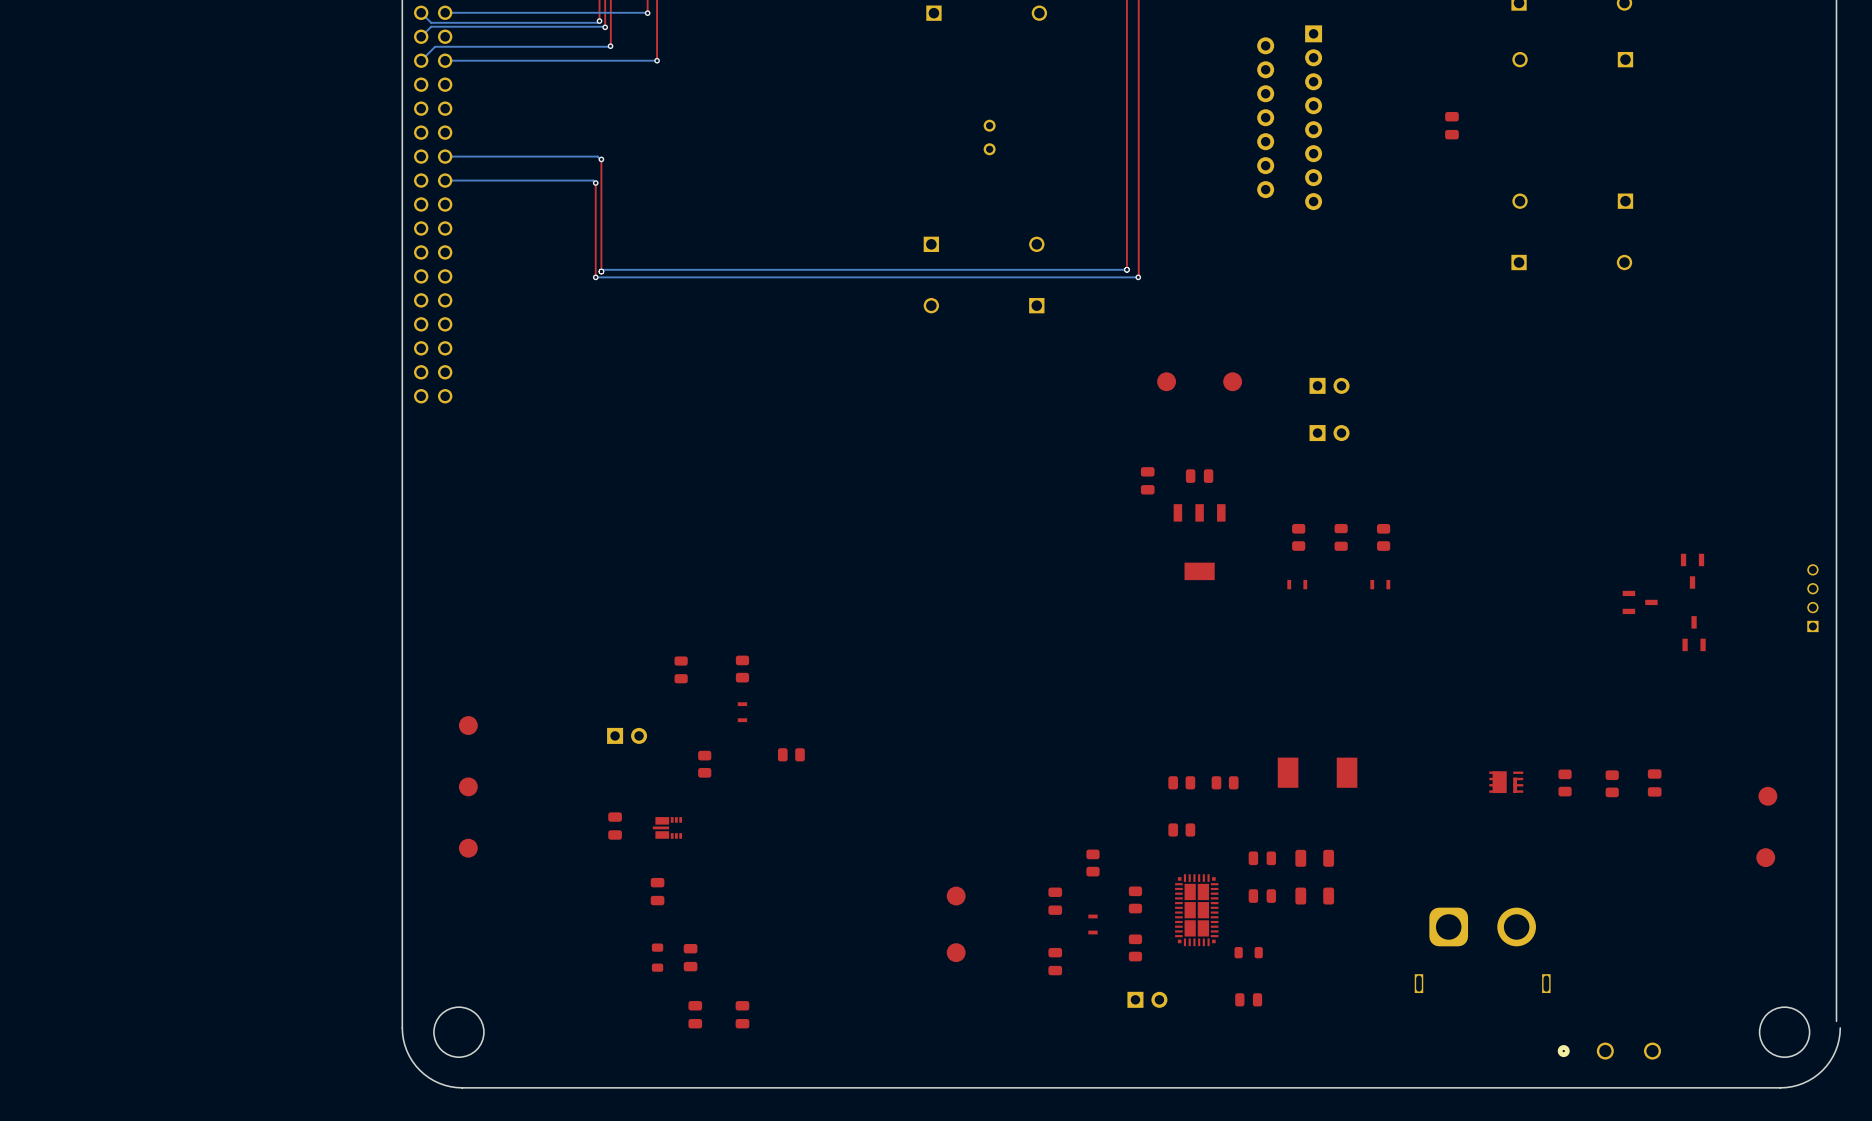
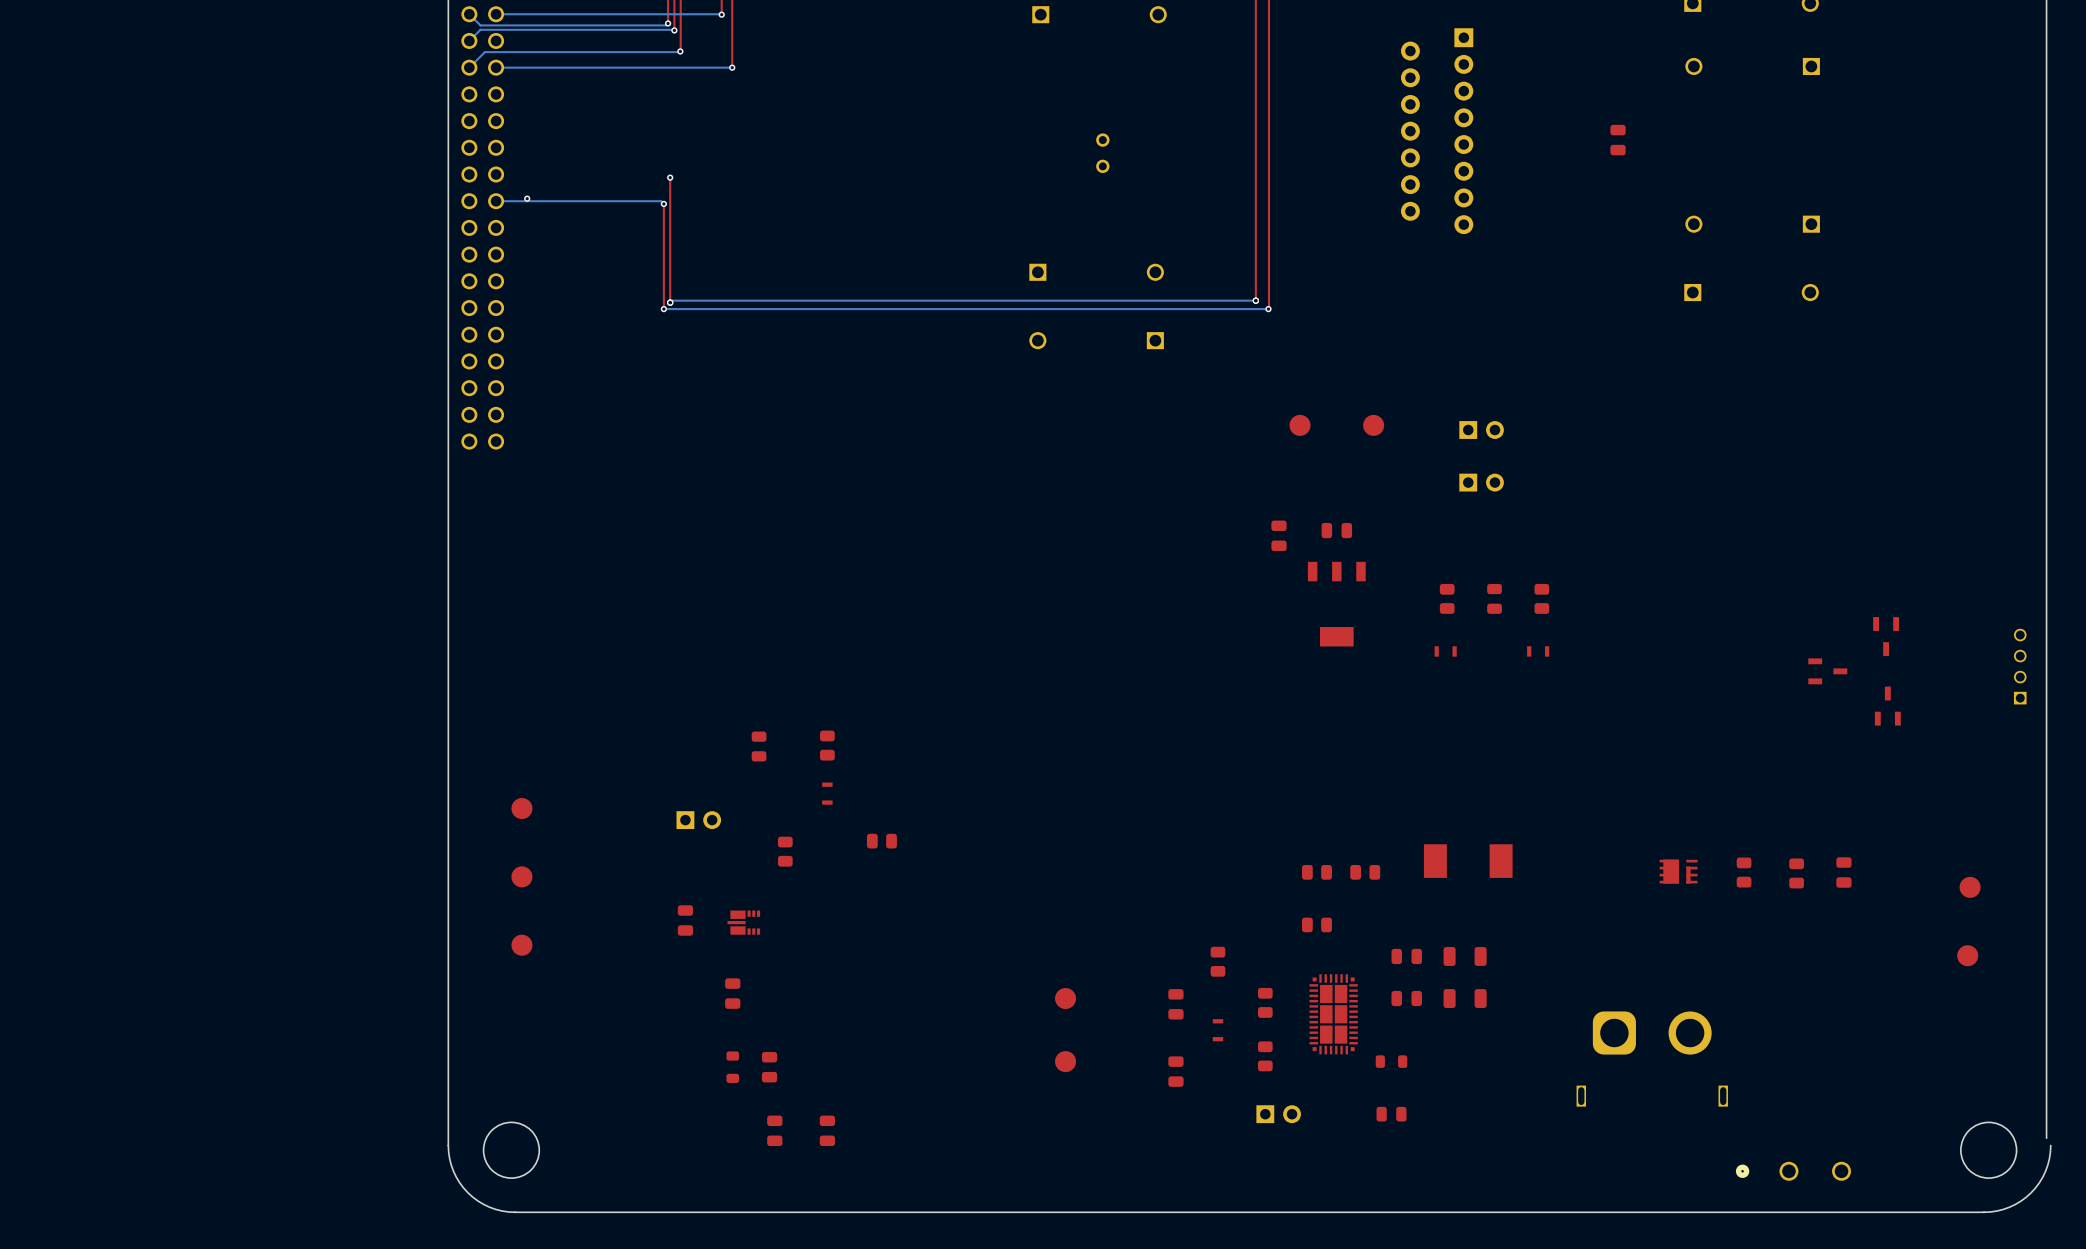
bottom track: (445, 156) (597, 156) (601, 159) -> none
via: none -> (527, 198)

